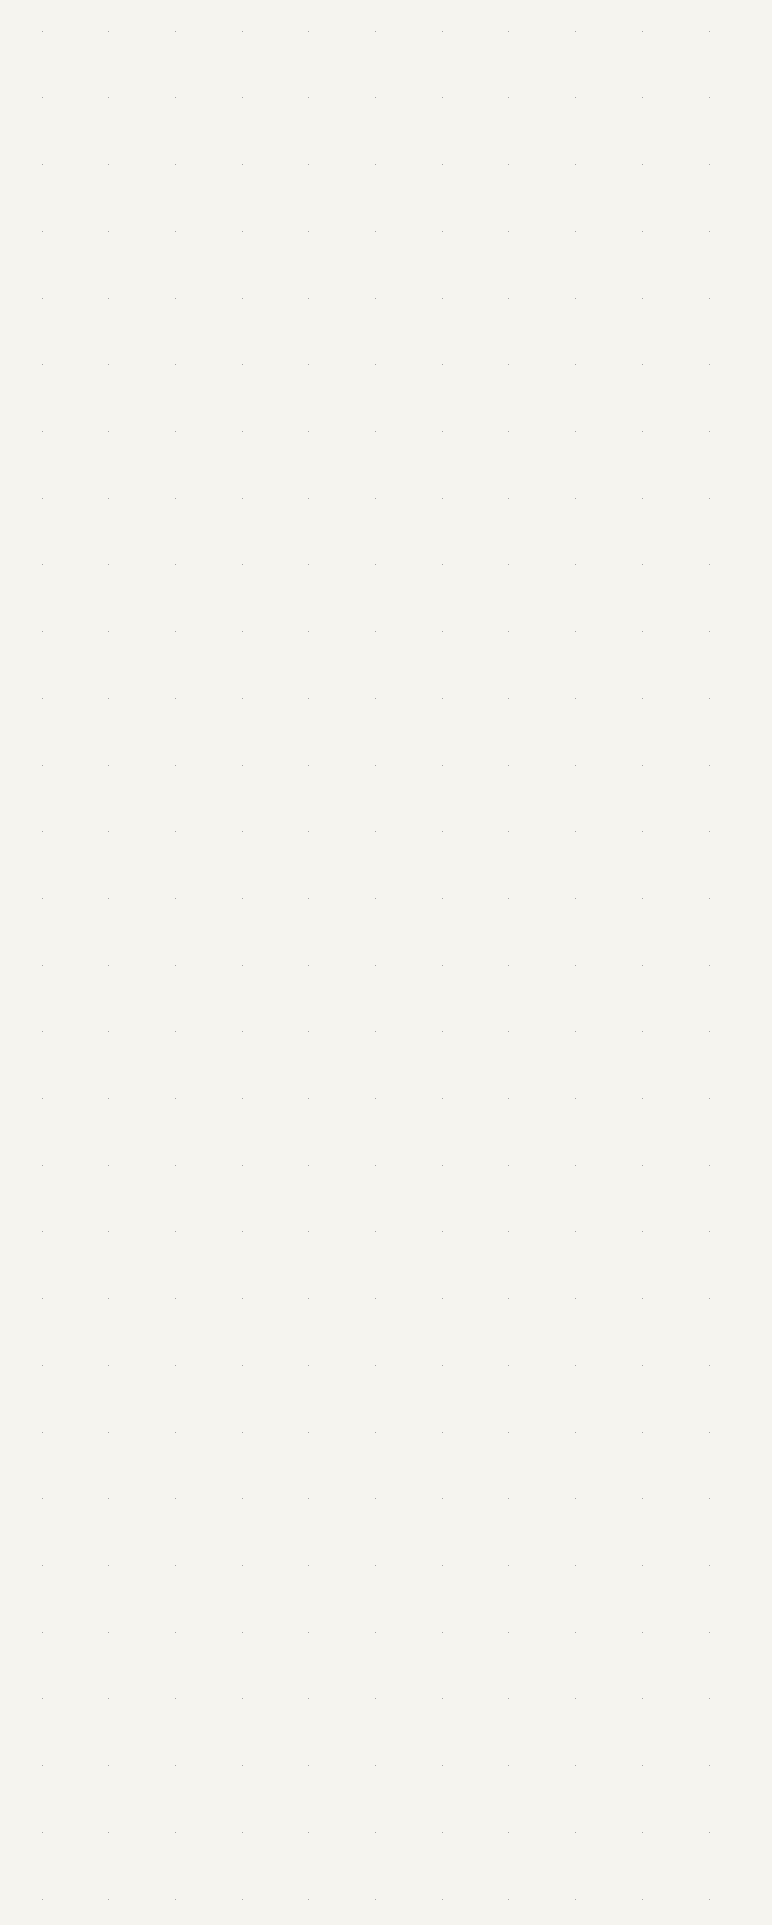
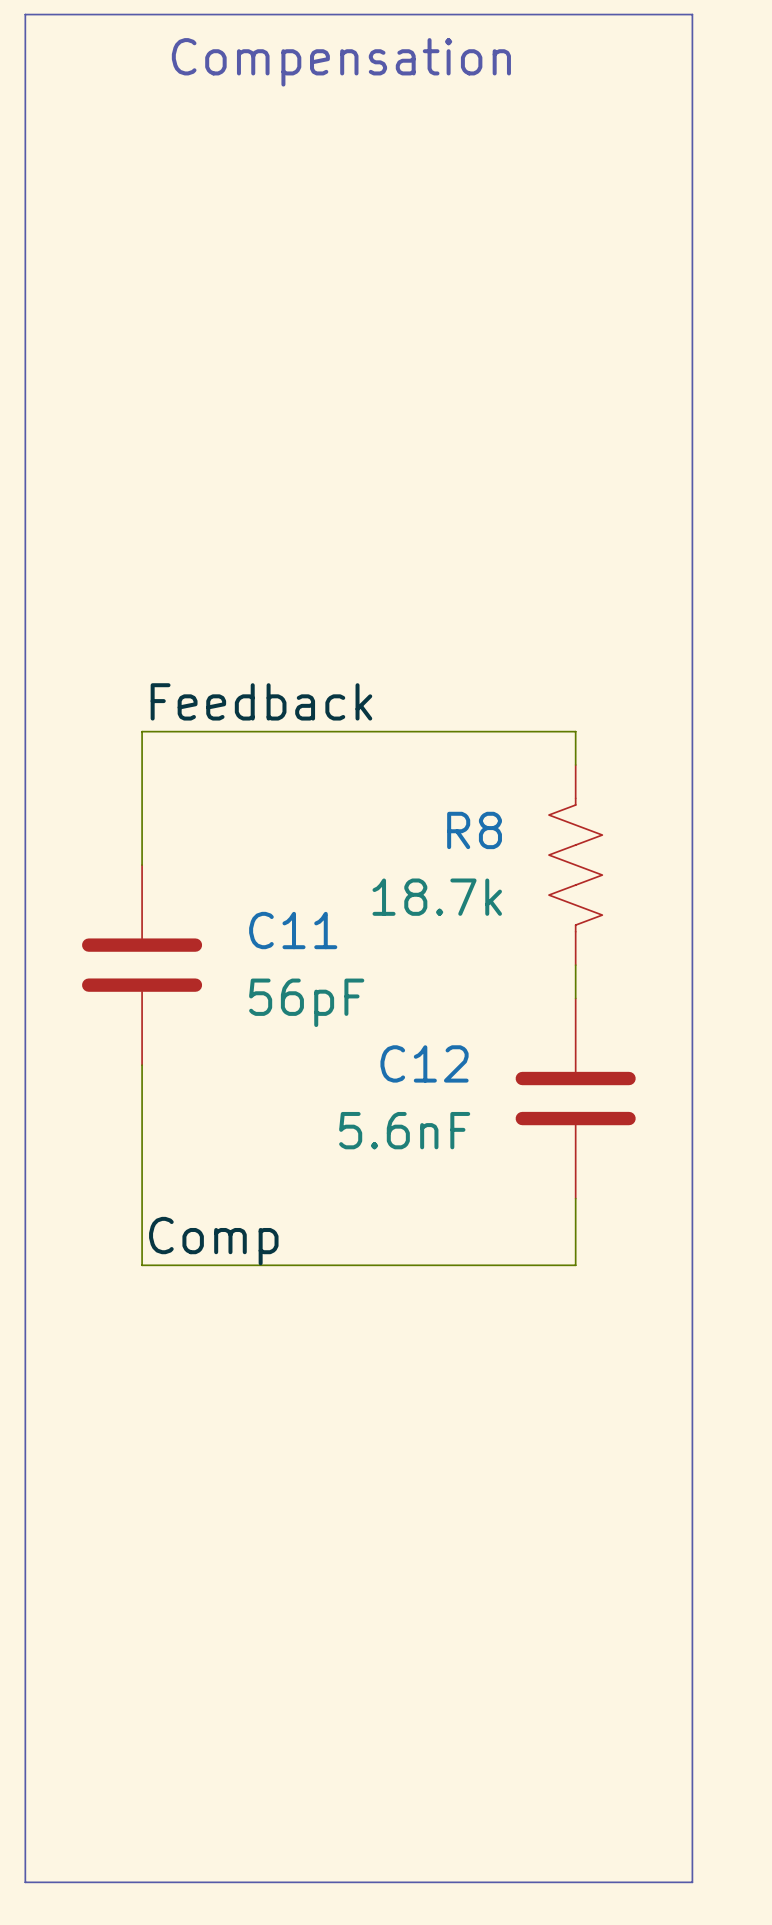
line: none -> (25, 14) (692, 14) (692, 1882) (25, 1882) (25, 14)
text: none -> Compensation (341, 62)
label: none -> Feedback (261, 701)
wire: none -> (575, 765) (575, 731) (142, 731) (142, 865)
R8: none -> 18.7k (575, 865)
C11: none -> 56pF (142, 965)
wire: none -> (575, 965) (575, 998)
wire: none -> (142, 1065) (142, 1265) (575, 1265) (575, 1198)
C12: none -> 5.6nF (575, 1098)
label: none -> Comp (213, 1241)

